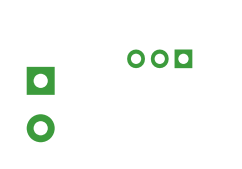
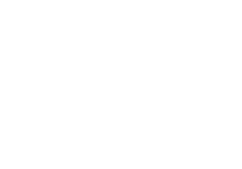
part: (159, 58) -> none
part: (40, 104) -> none

